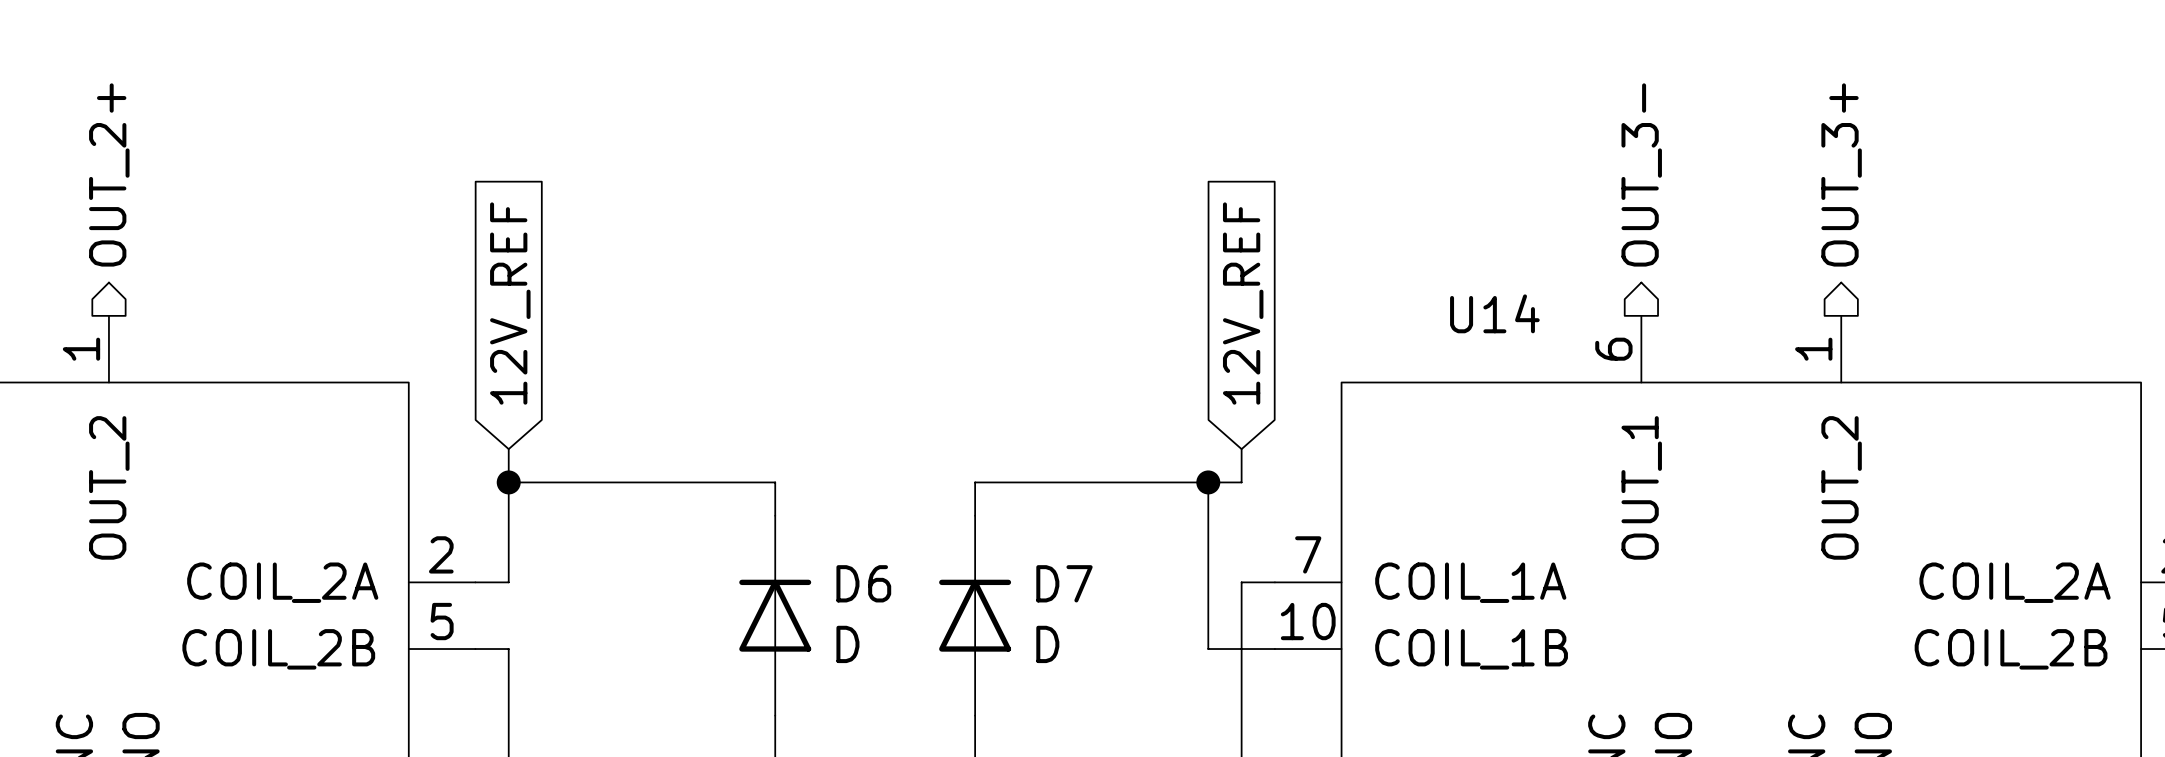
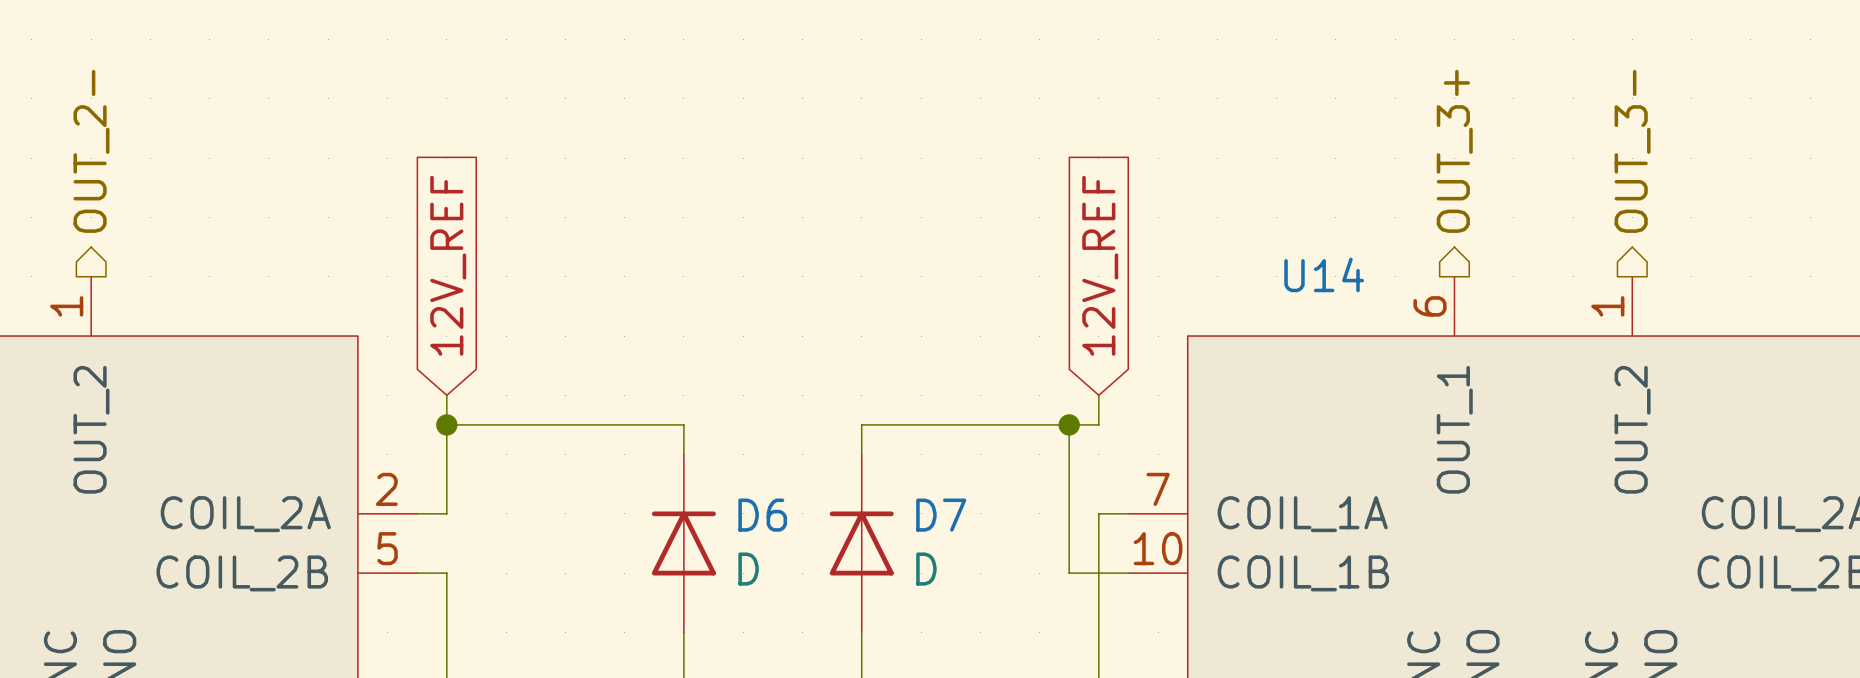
hierarchical label: OUT_2+ (109, 174) -> OUT_2- (91, 151)
hierarchical label: OUT_3- (1641, 174) -> OUT_3+ (1454, 151)
hierarchical label: OUT_3+ (1841, 174) -> OUT_3- (1632, 151)

